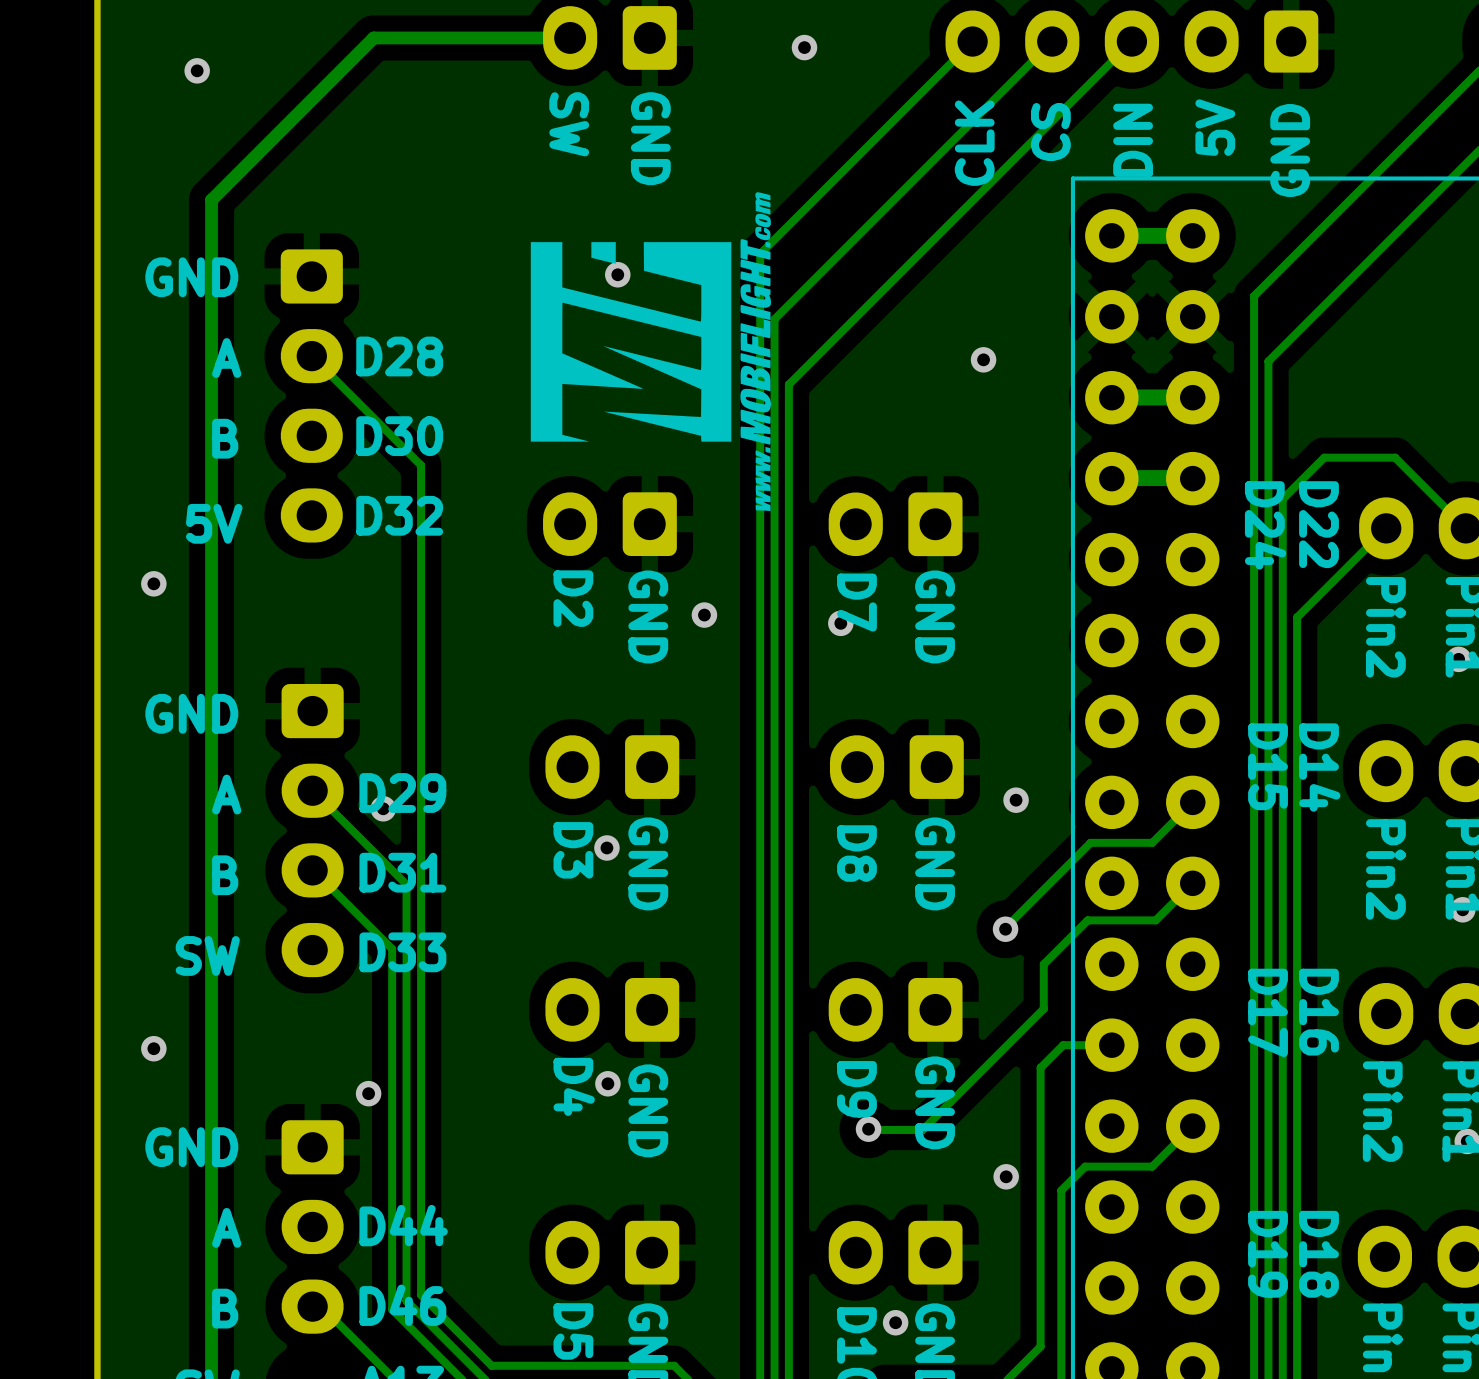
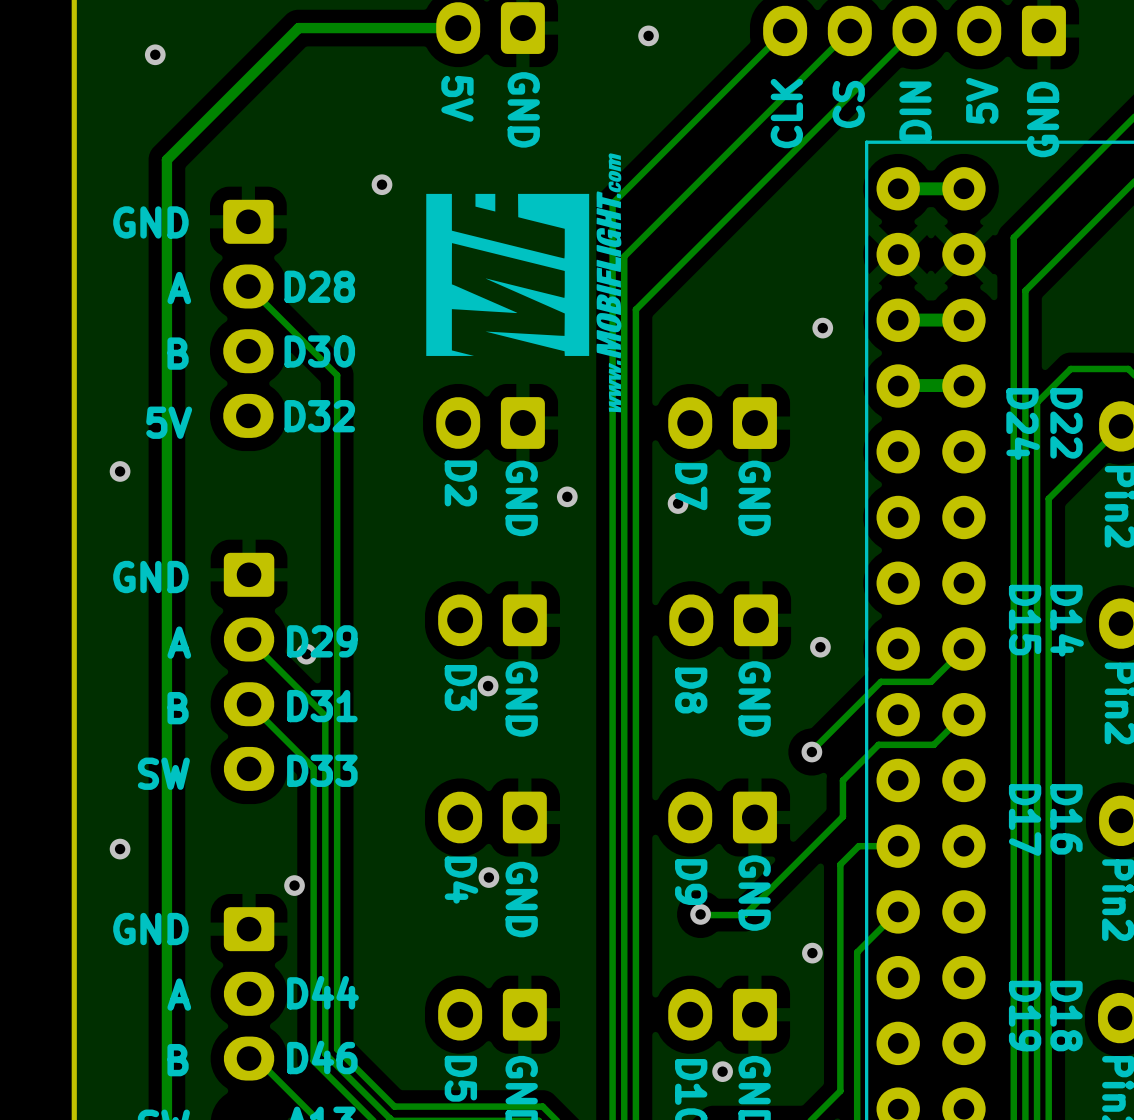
text: SW (569, 124) -> 5V (457, 98)
via position: (617, 274) -> (382, 184)
via position: (983, 359) -> (822, 328)
track: (1192, 1126) (1152, 1166) (1085, 1166) (1061, 1190) -> (898, 911) (857, 952) (857, 964)

